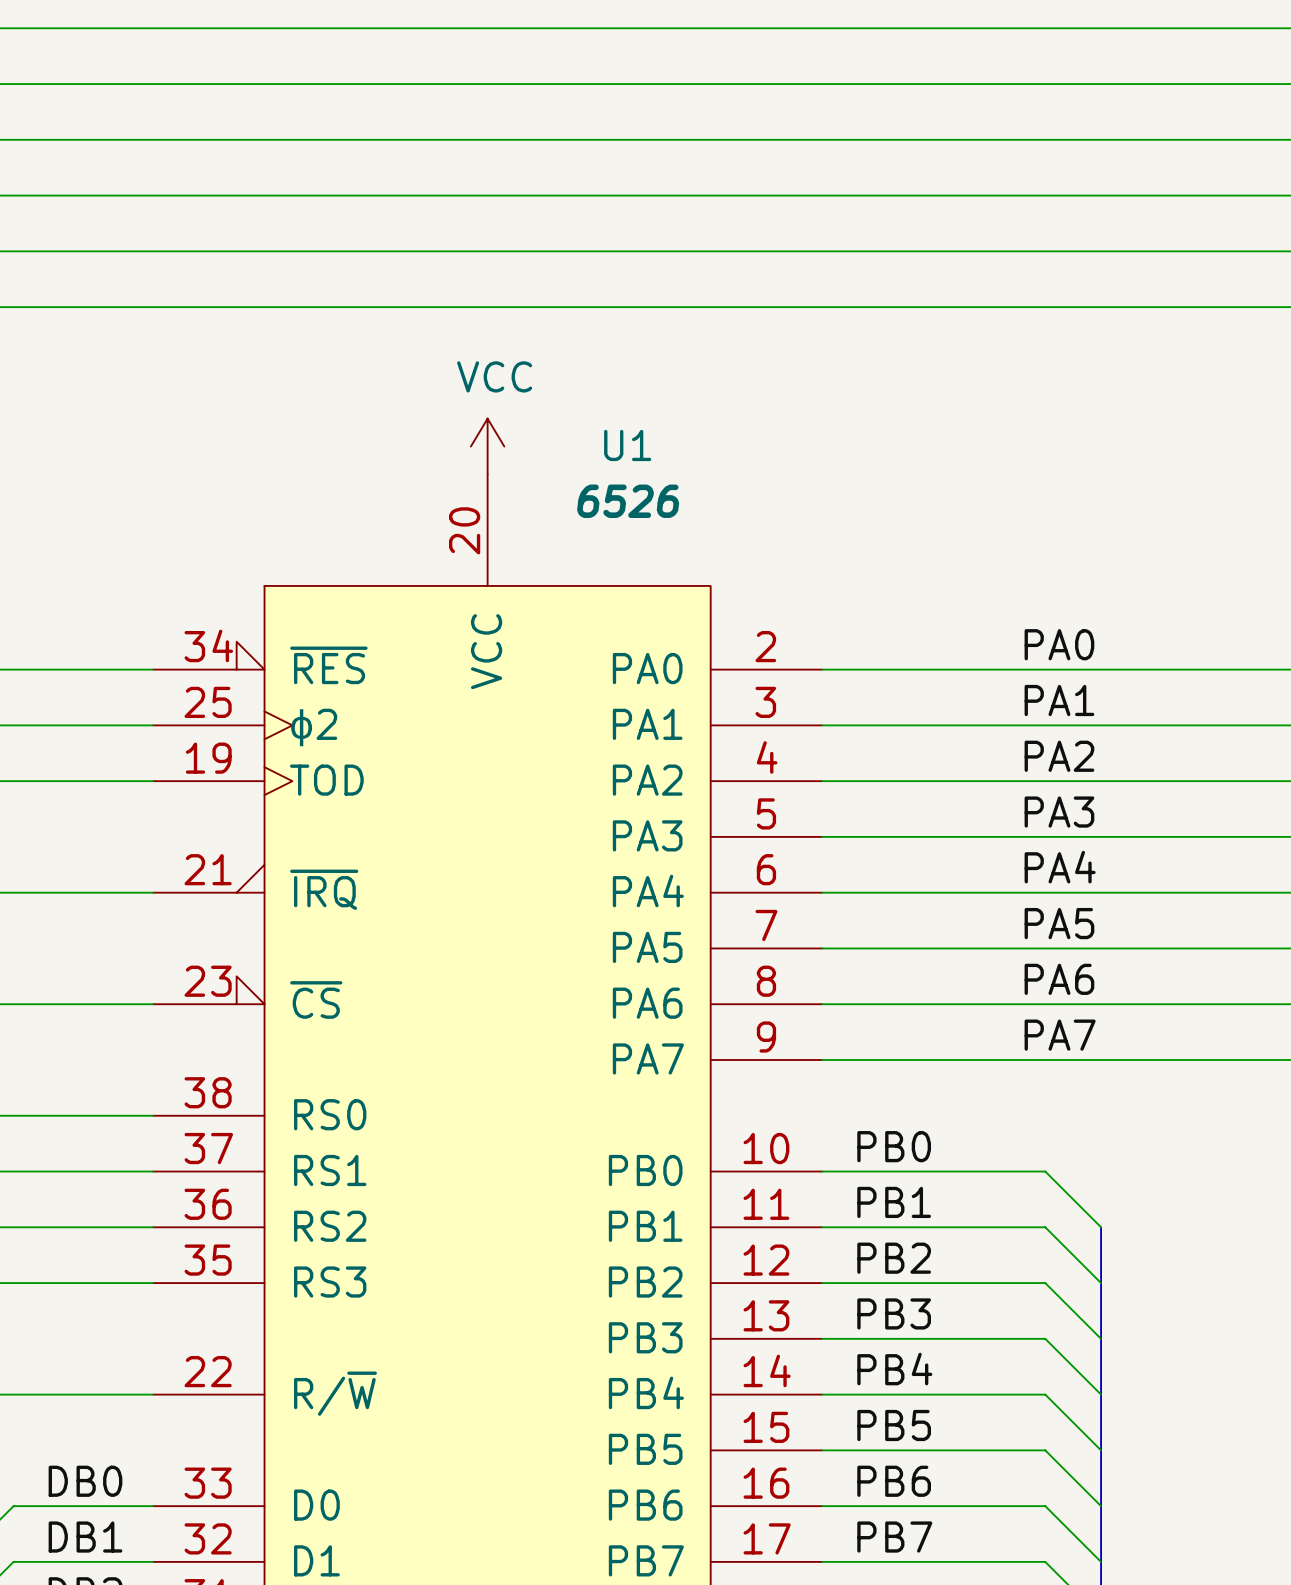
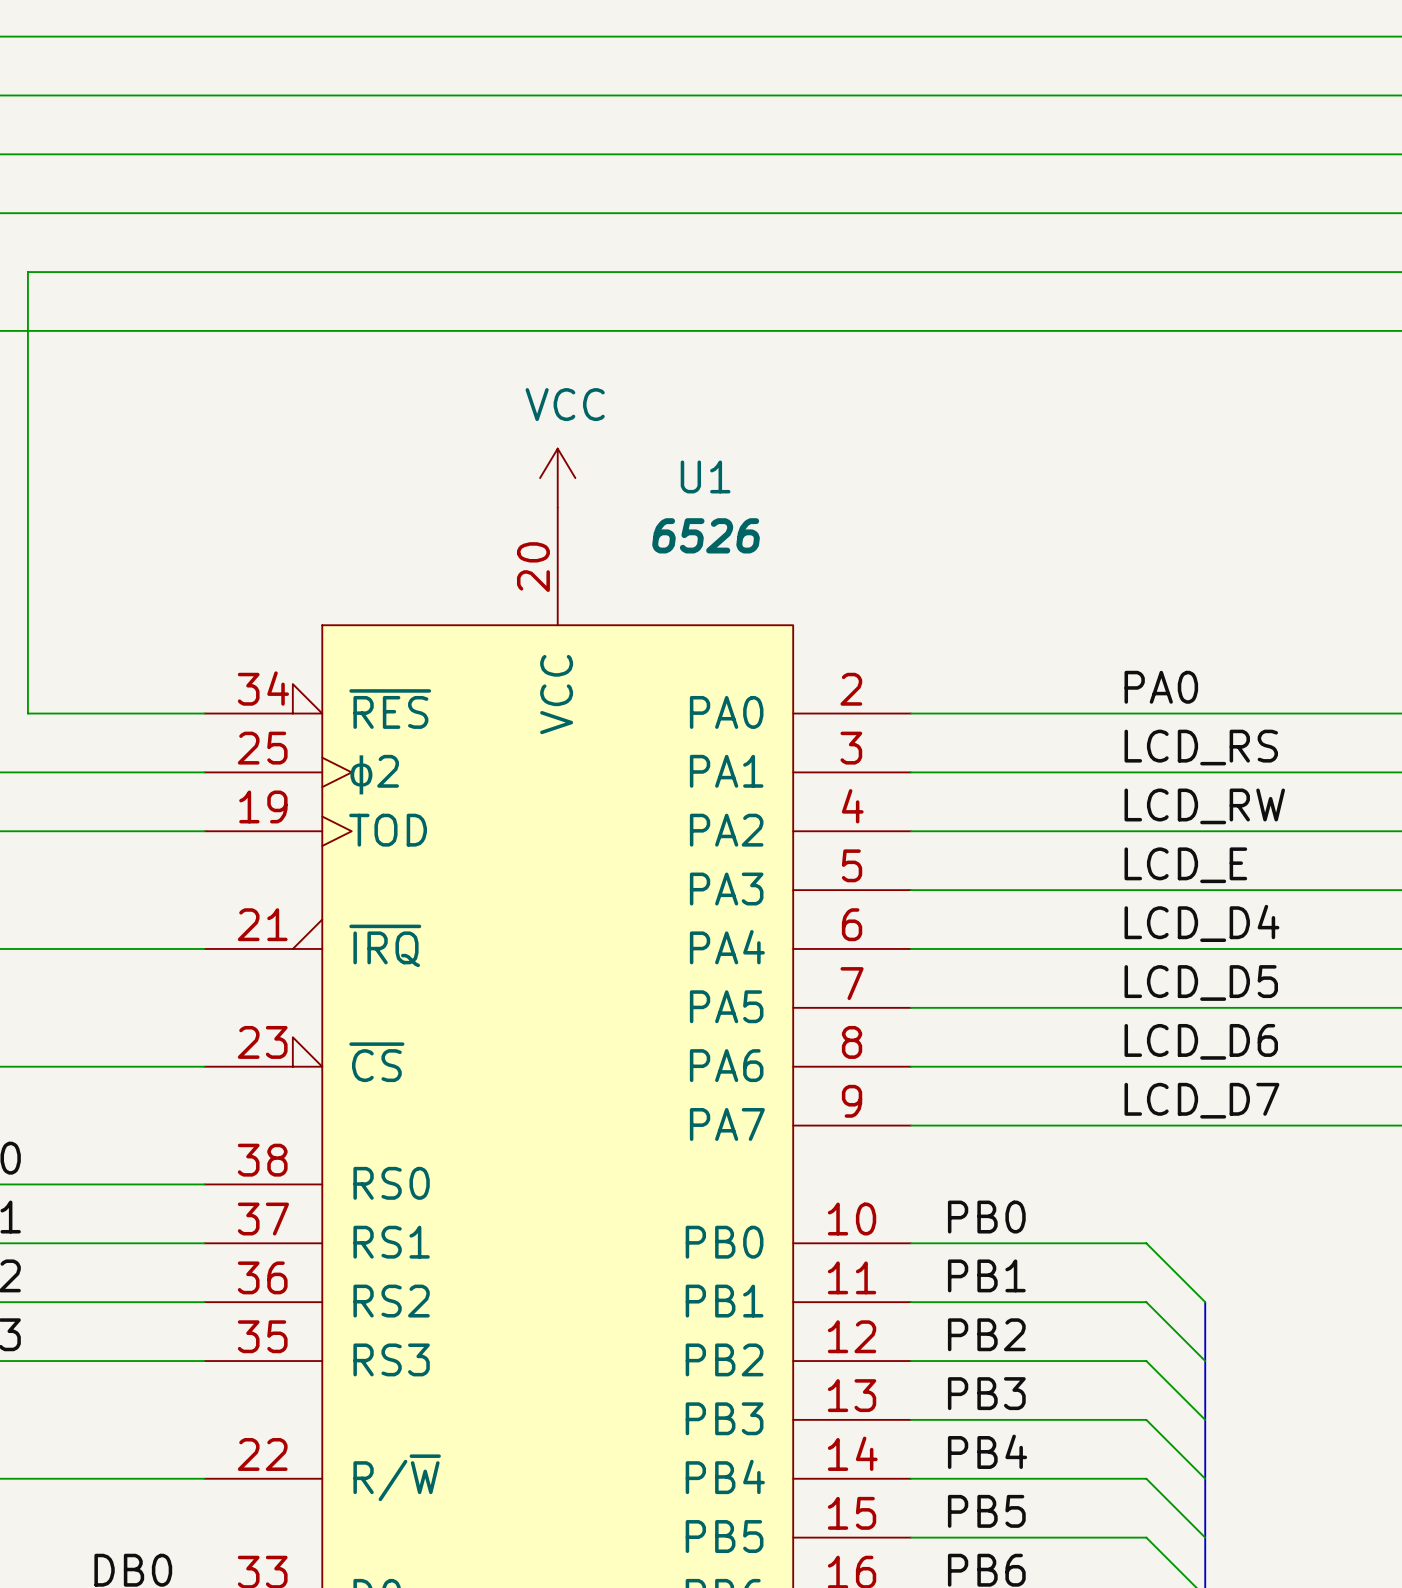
label: PA1 (1059, 700) -> LCD_RS (1201, 747)
label: PA2 (1059, 756) -> LCD_RW (1204, 806)
label: PA3 (1059, 812) -> LCD_E (1185, 865)
label: PA4 (1060, 867) -> LCD_D4 (1201, 923)
label: PA5 (1059, 923) -> LCD_D5 (1201, 982)
label: PA6 (1059, 979) -> LCD_D6 (1201, 1041)
label: PA7 (1060, 1035) -> LCD_D7 (1201, 1100)

